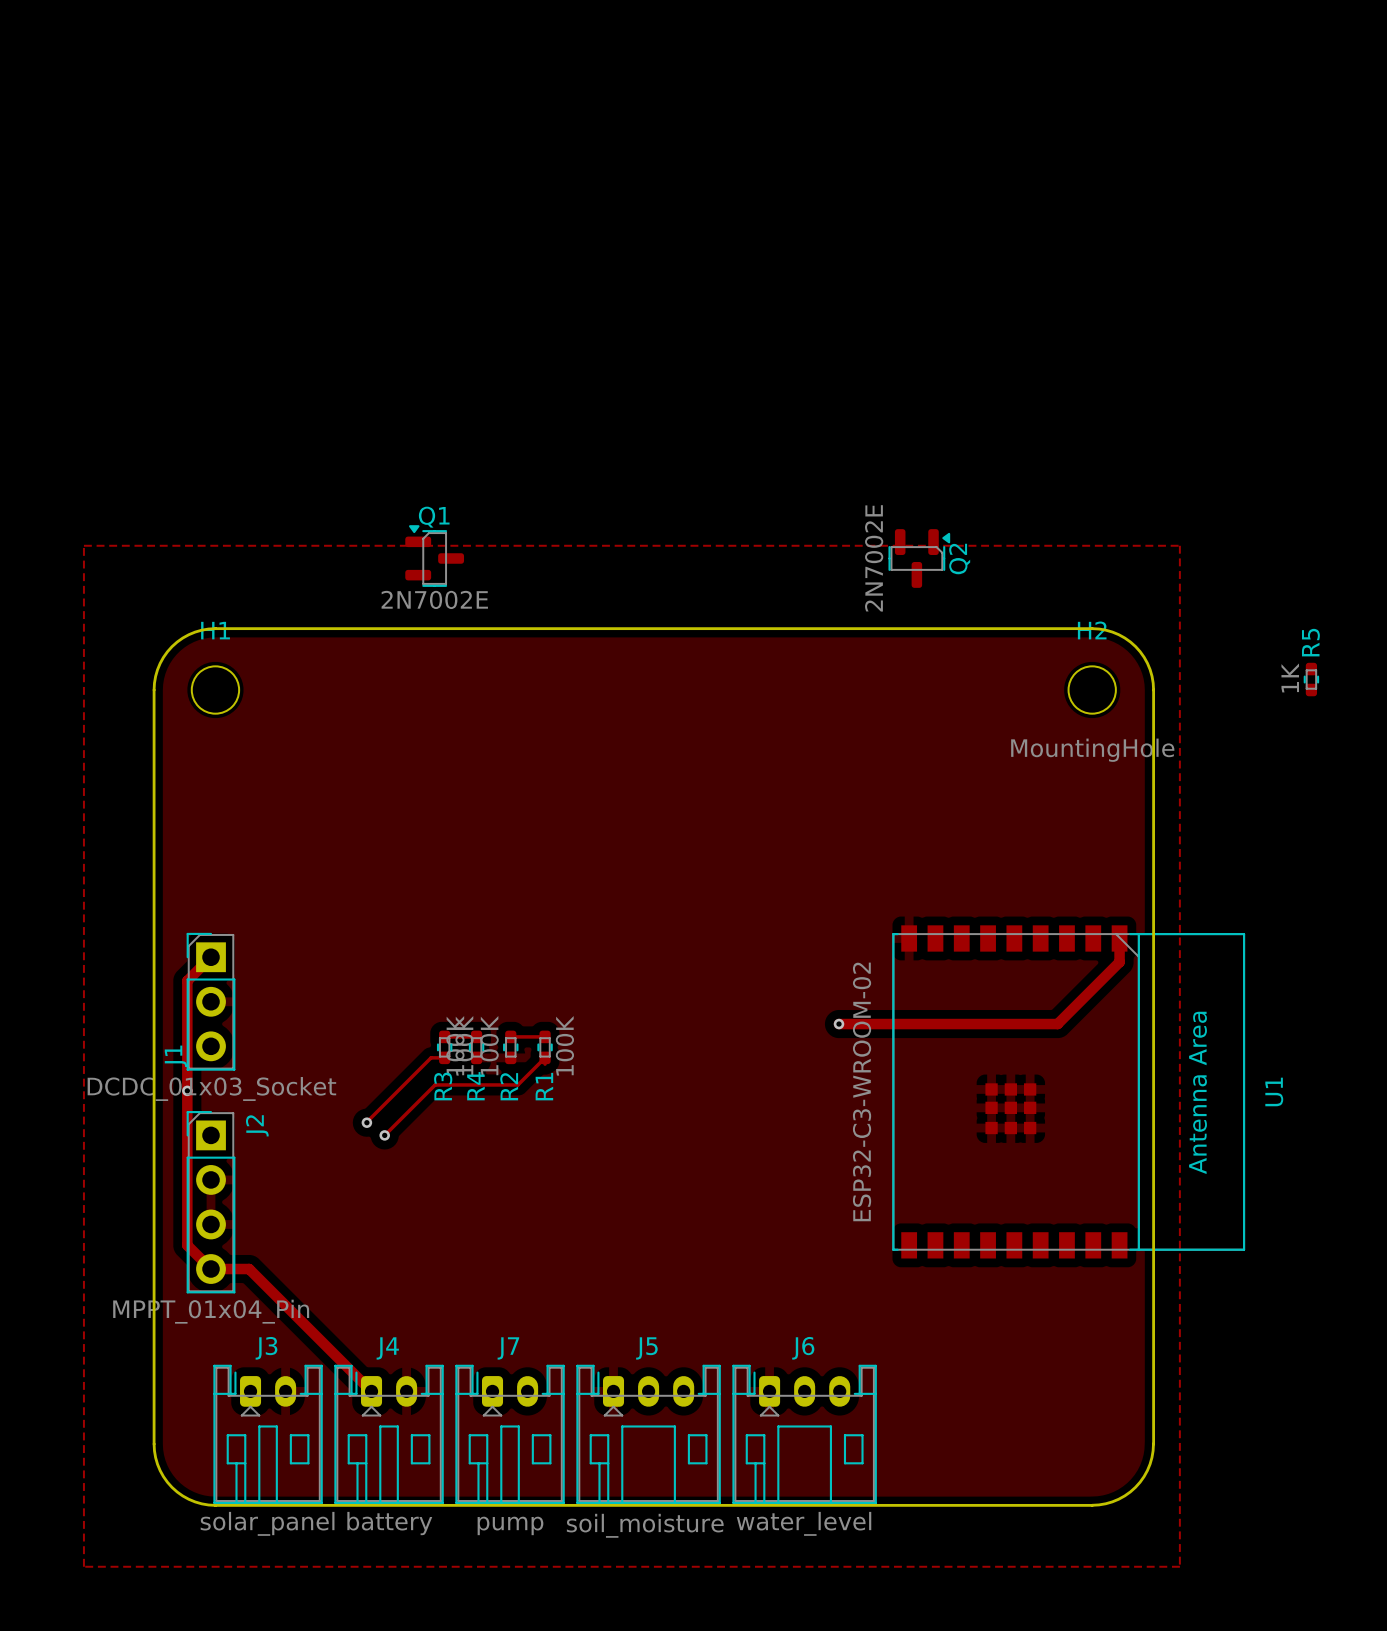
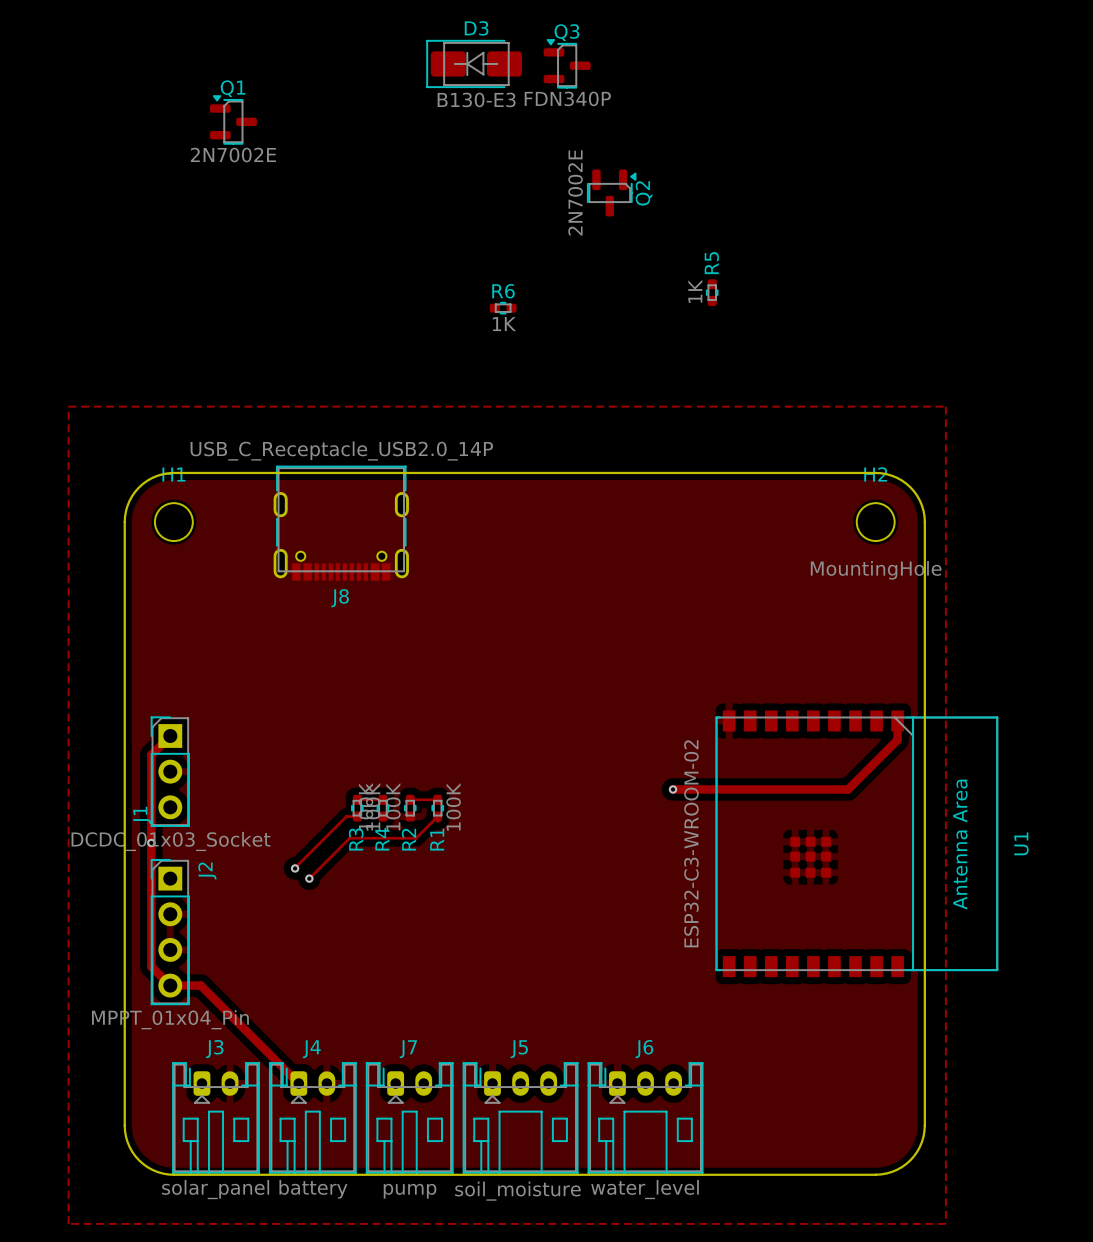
D3: none -> B130-E3 (474, 63)
Q3: none -> FDN340P (567, 63)
R6: none -> 1K (503, 308)
Q1 position: (434, 556) -> (233, 119)
Q2 position: (919, 558) -> (611, 192)
R5 position: (1311, 679) -> (712, 292)
J8: none -> USB_C_Receptacle_USB2.0_14P (341, 523)

